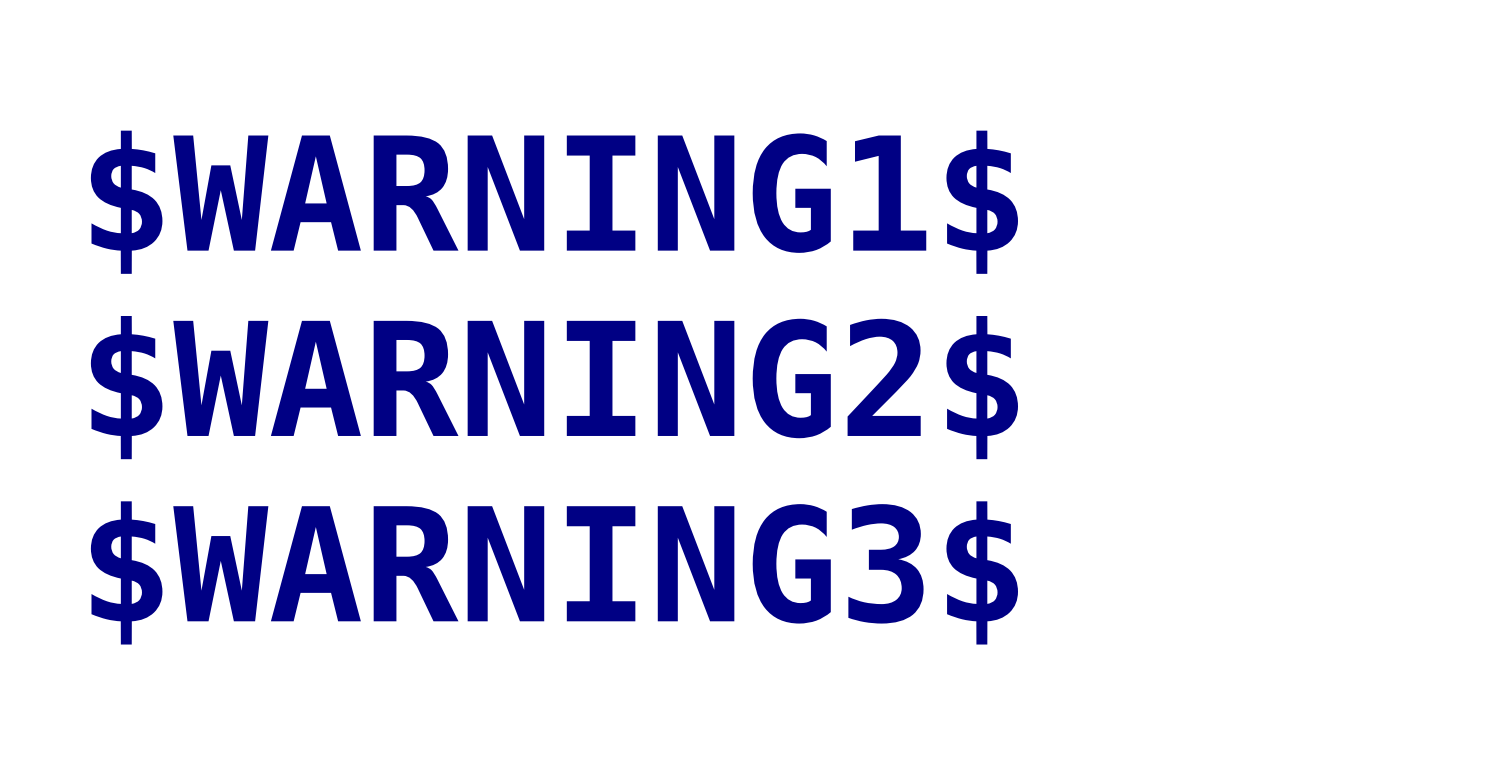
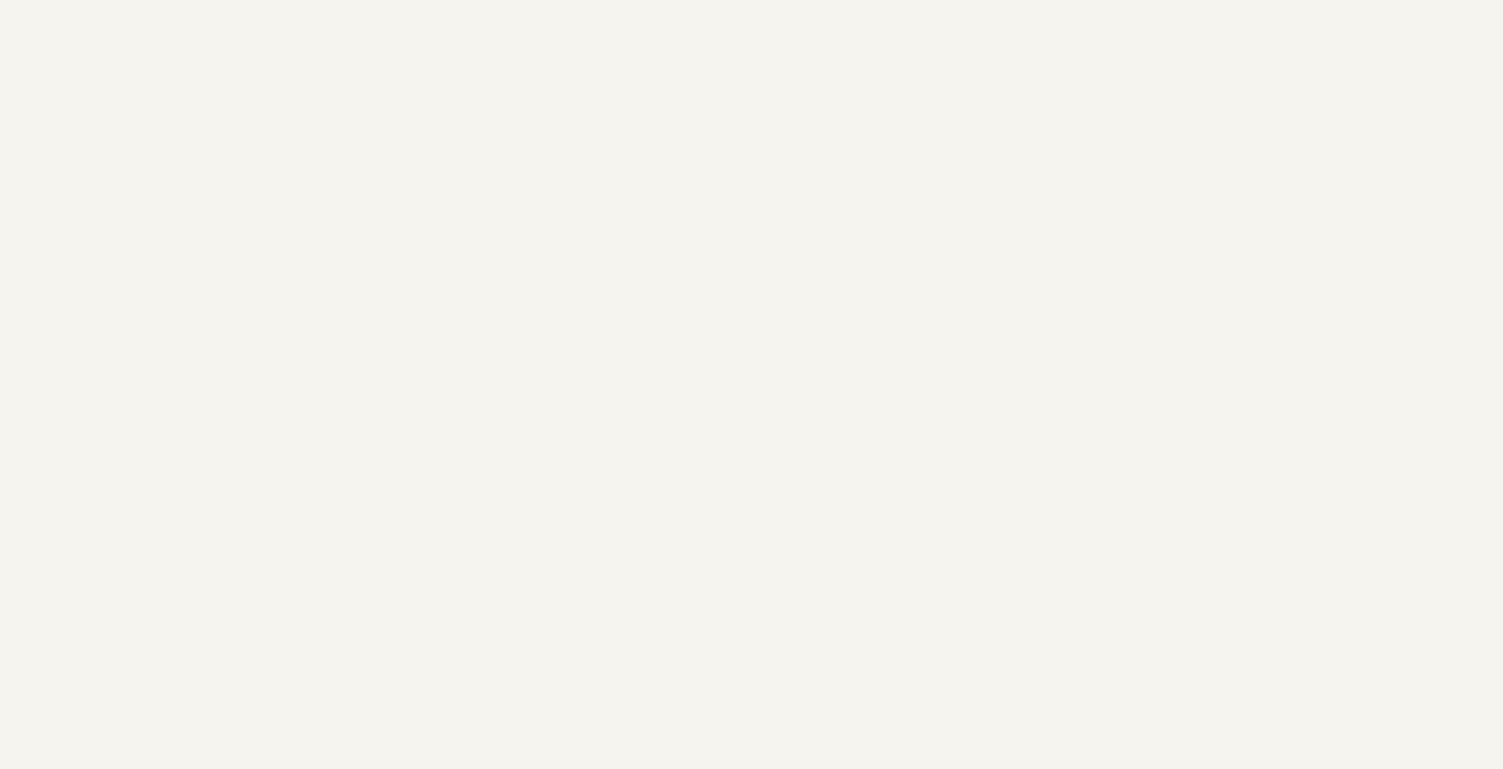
text: $WARNING1$ (554, 202) -> none
text: $WARNING2$ (554, 387) -> none
text: $WARNING3$ (554, 572) -> none

